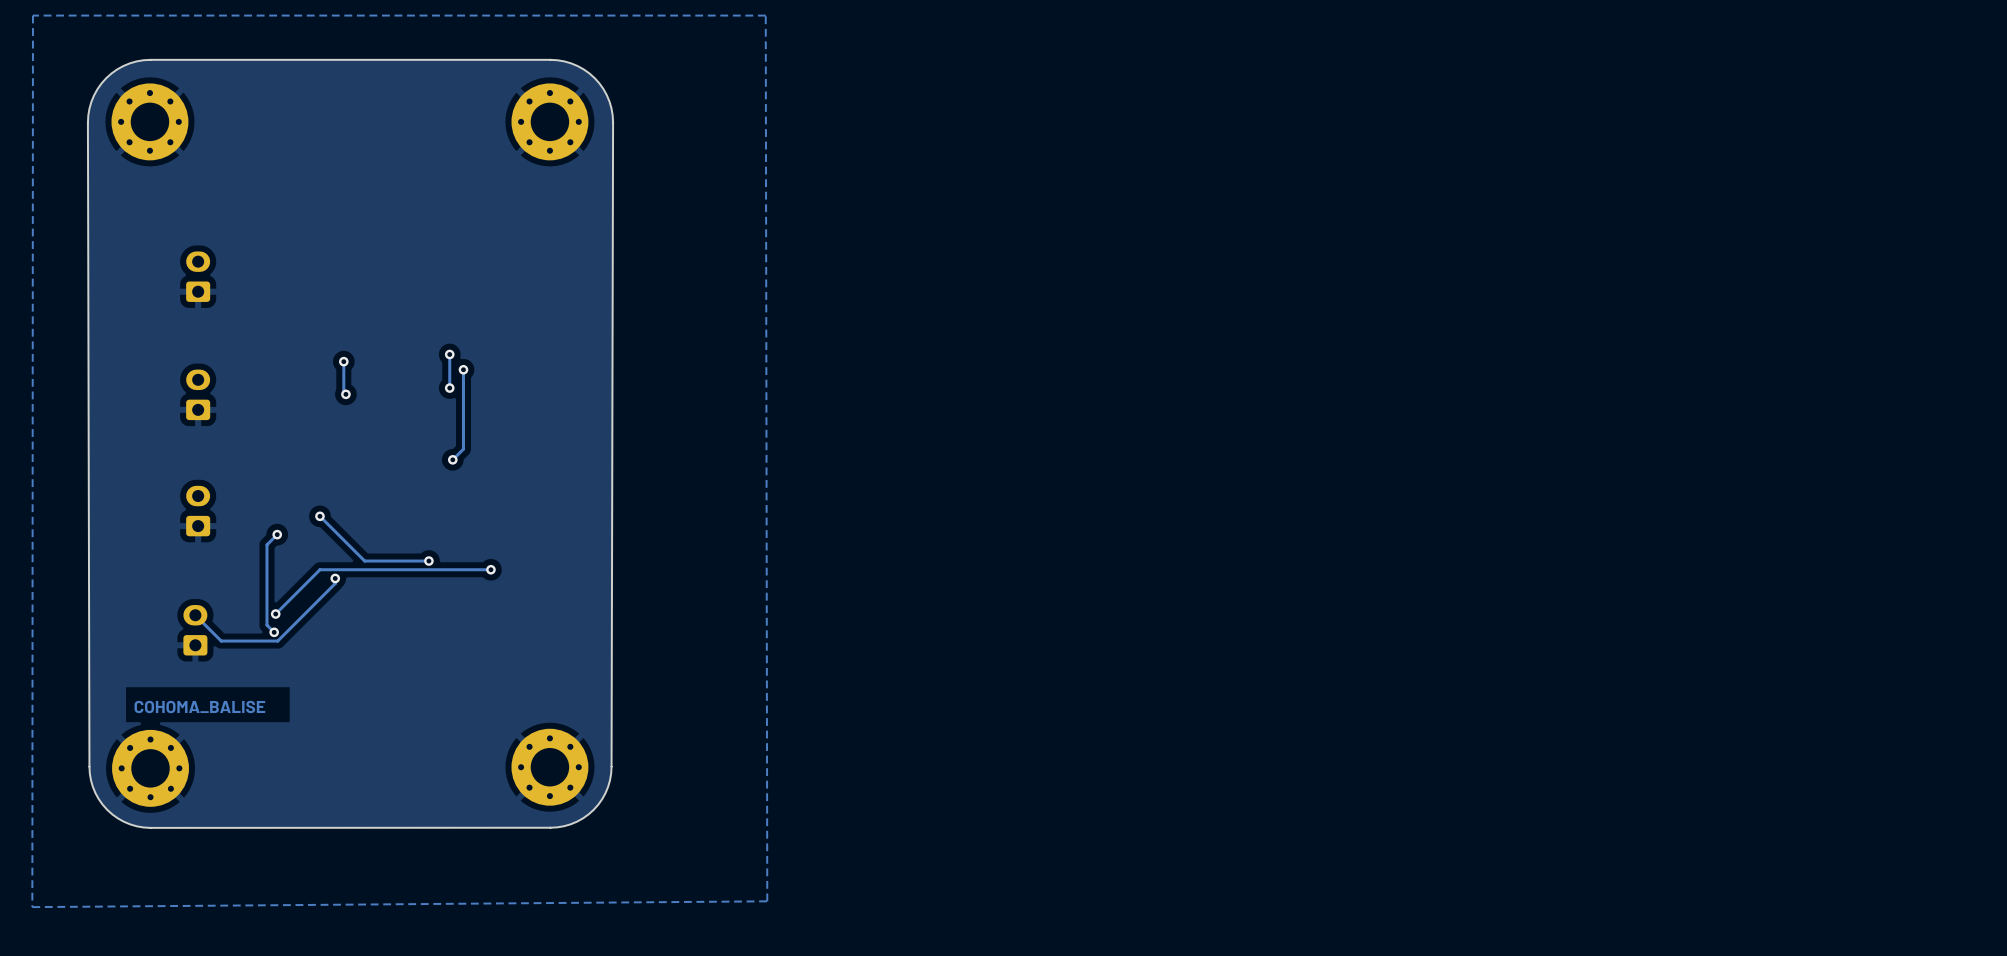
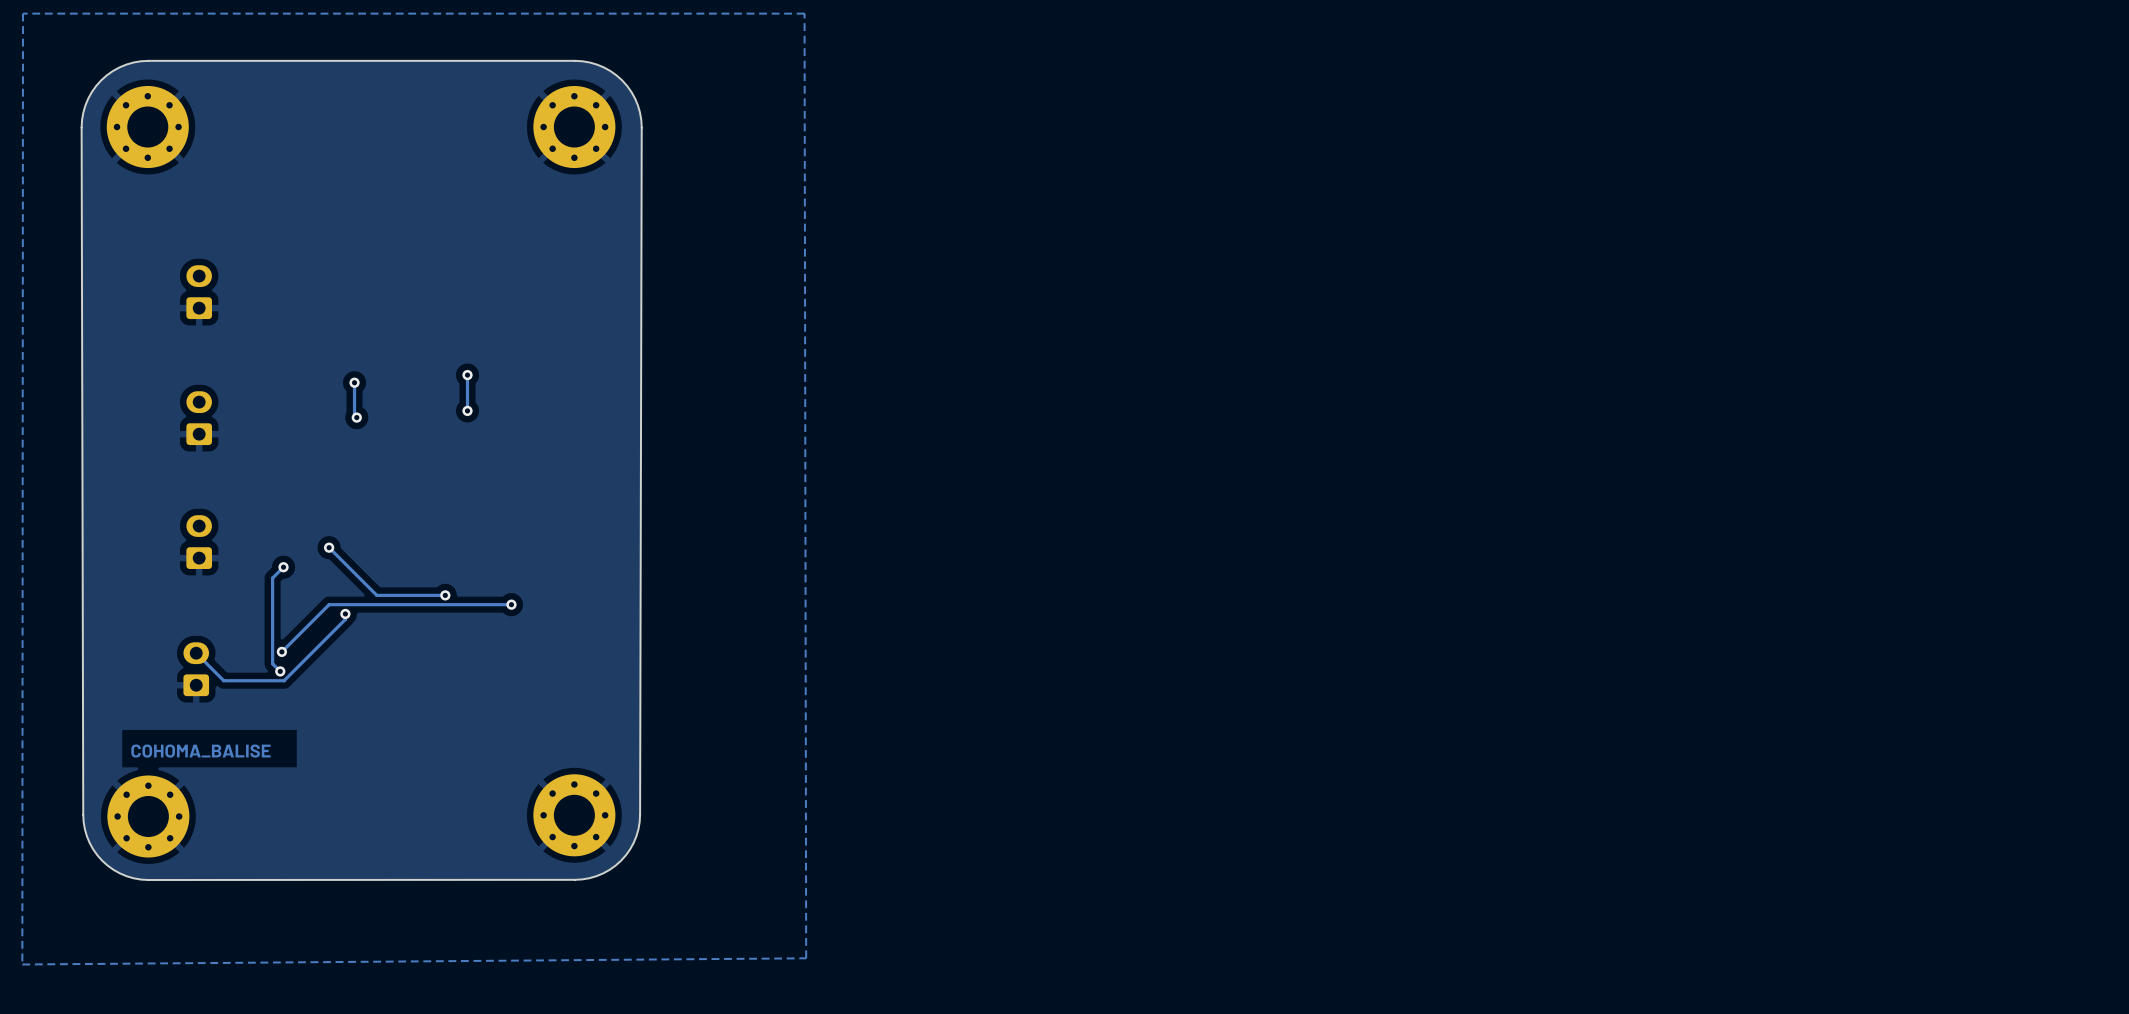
track: (463, 369) (463, 449) (452, 459) -> none
via: (463, 369) -> none
via: (452, 459) -> none

